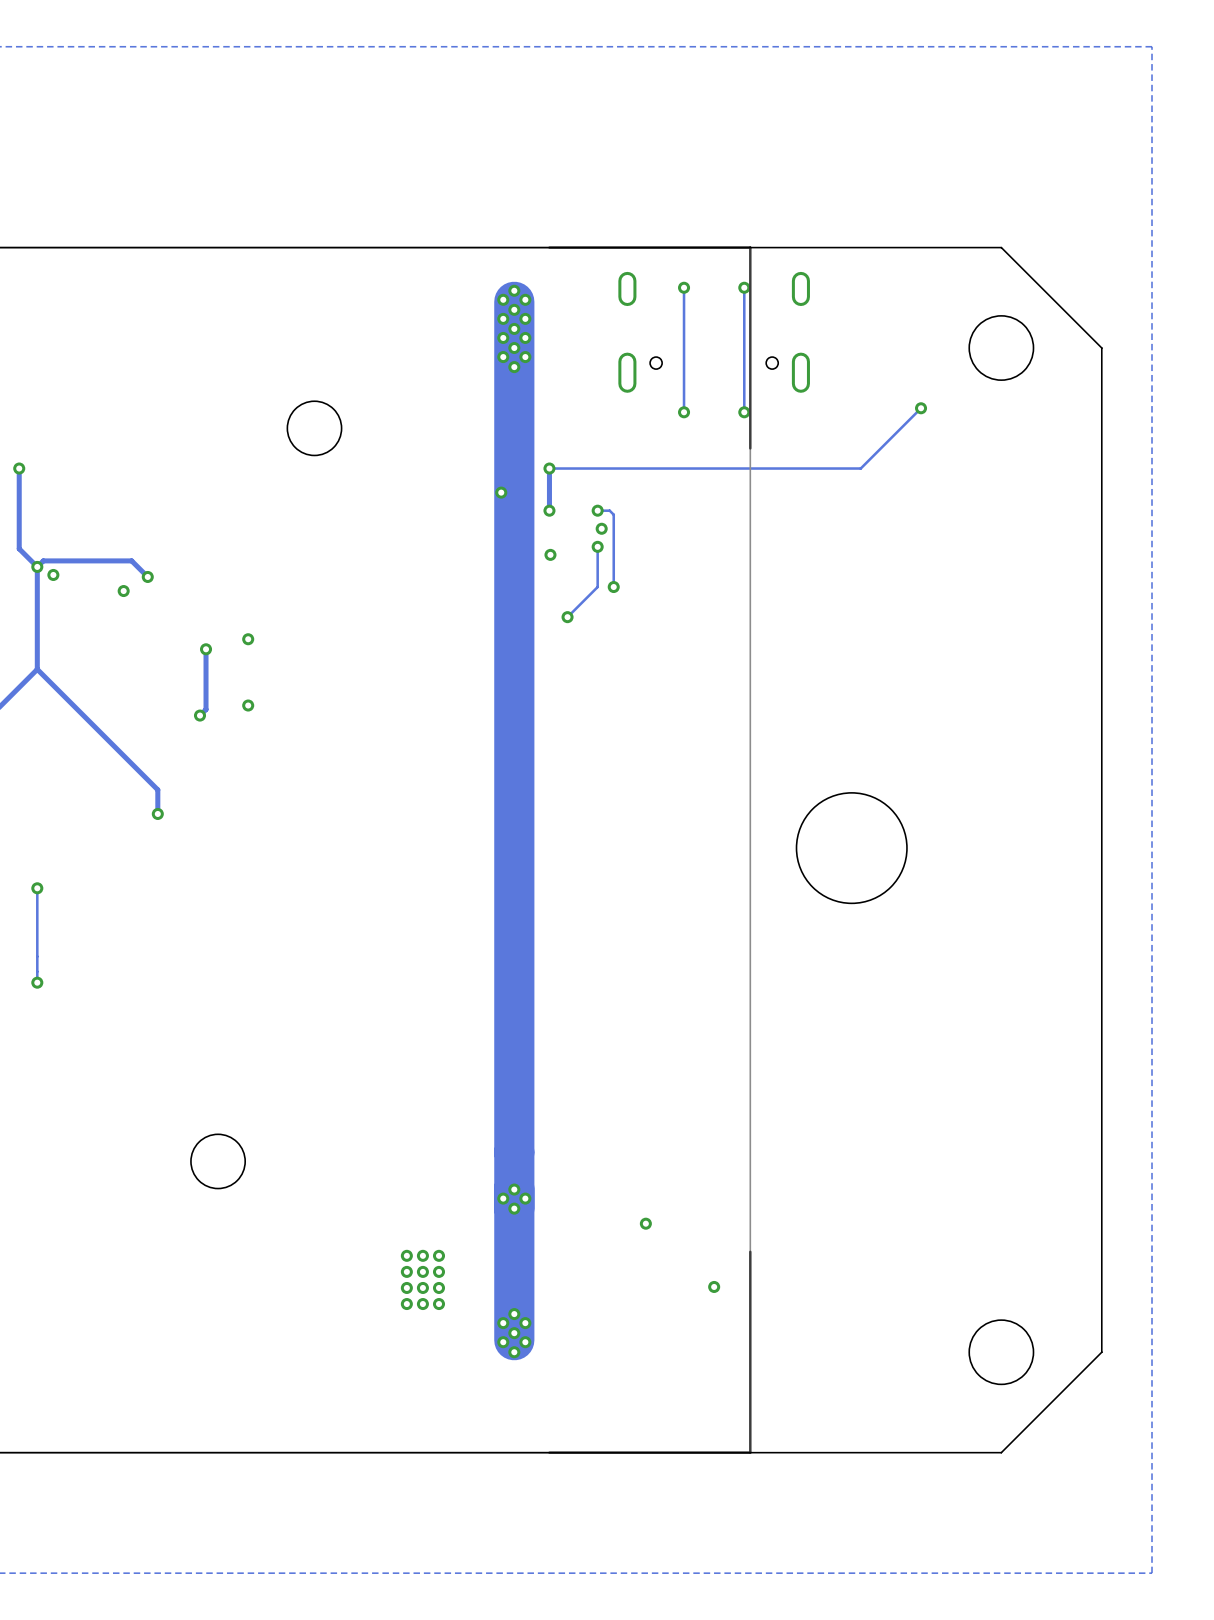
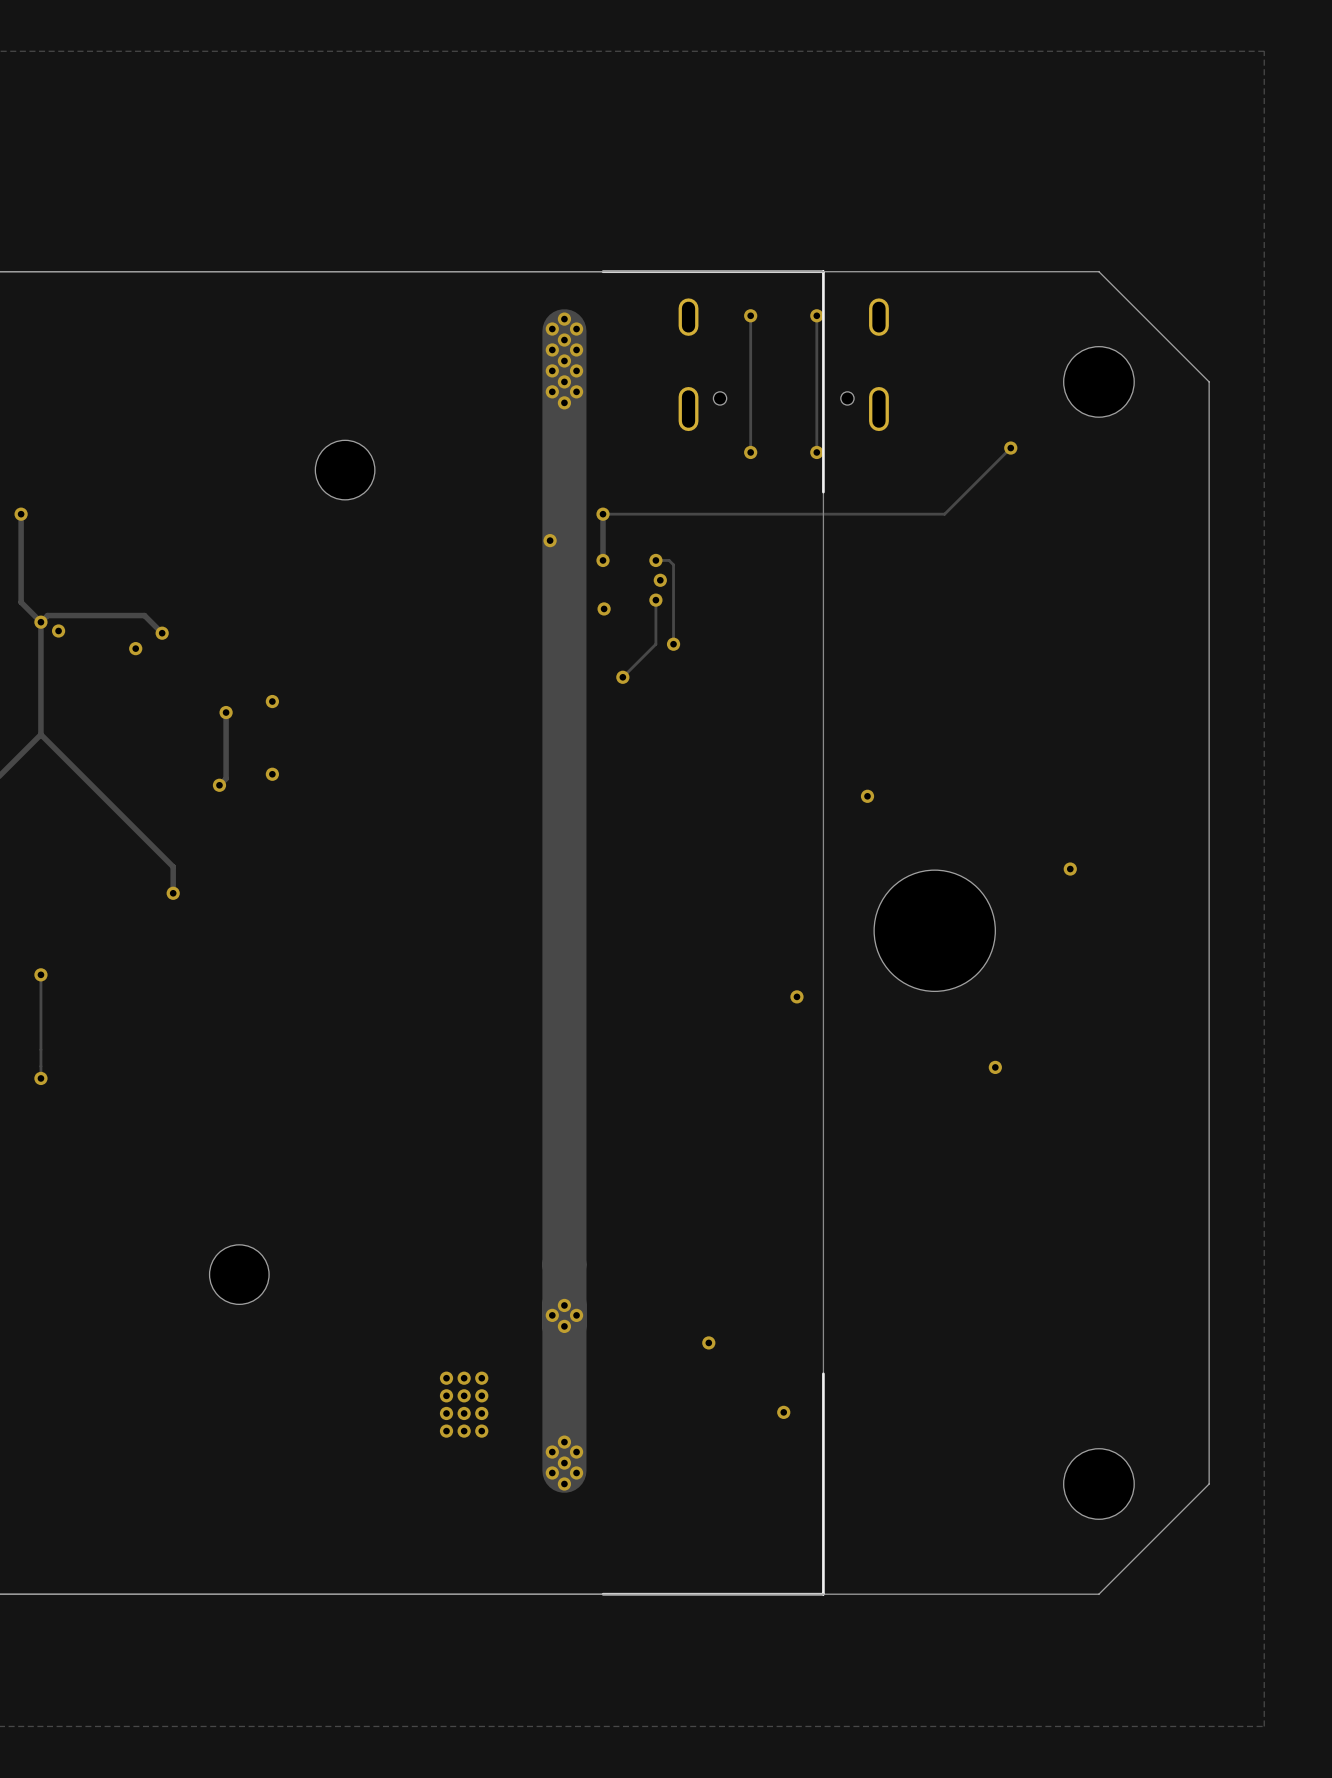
via: none -> (867, 796)
via: none -> (1070, 869)
via: none -> (796, 996)
via: none -> (995, 1067)

